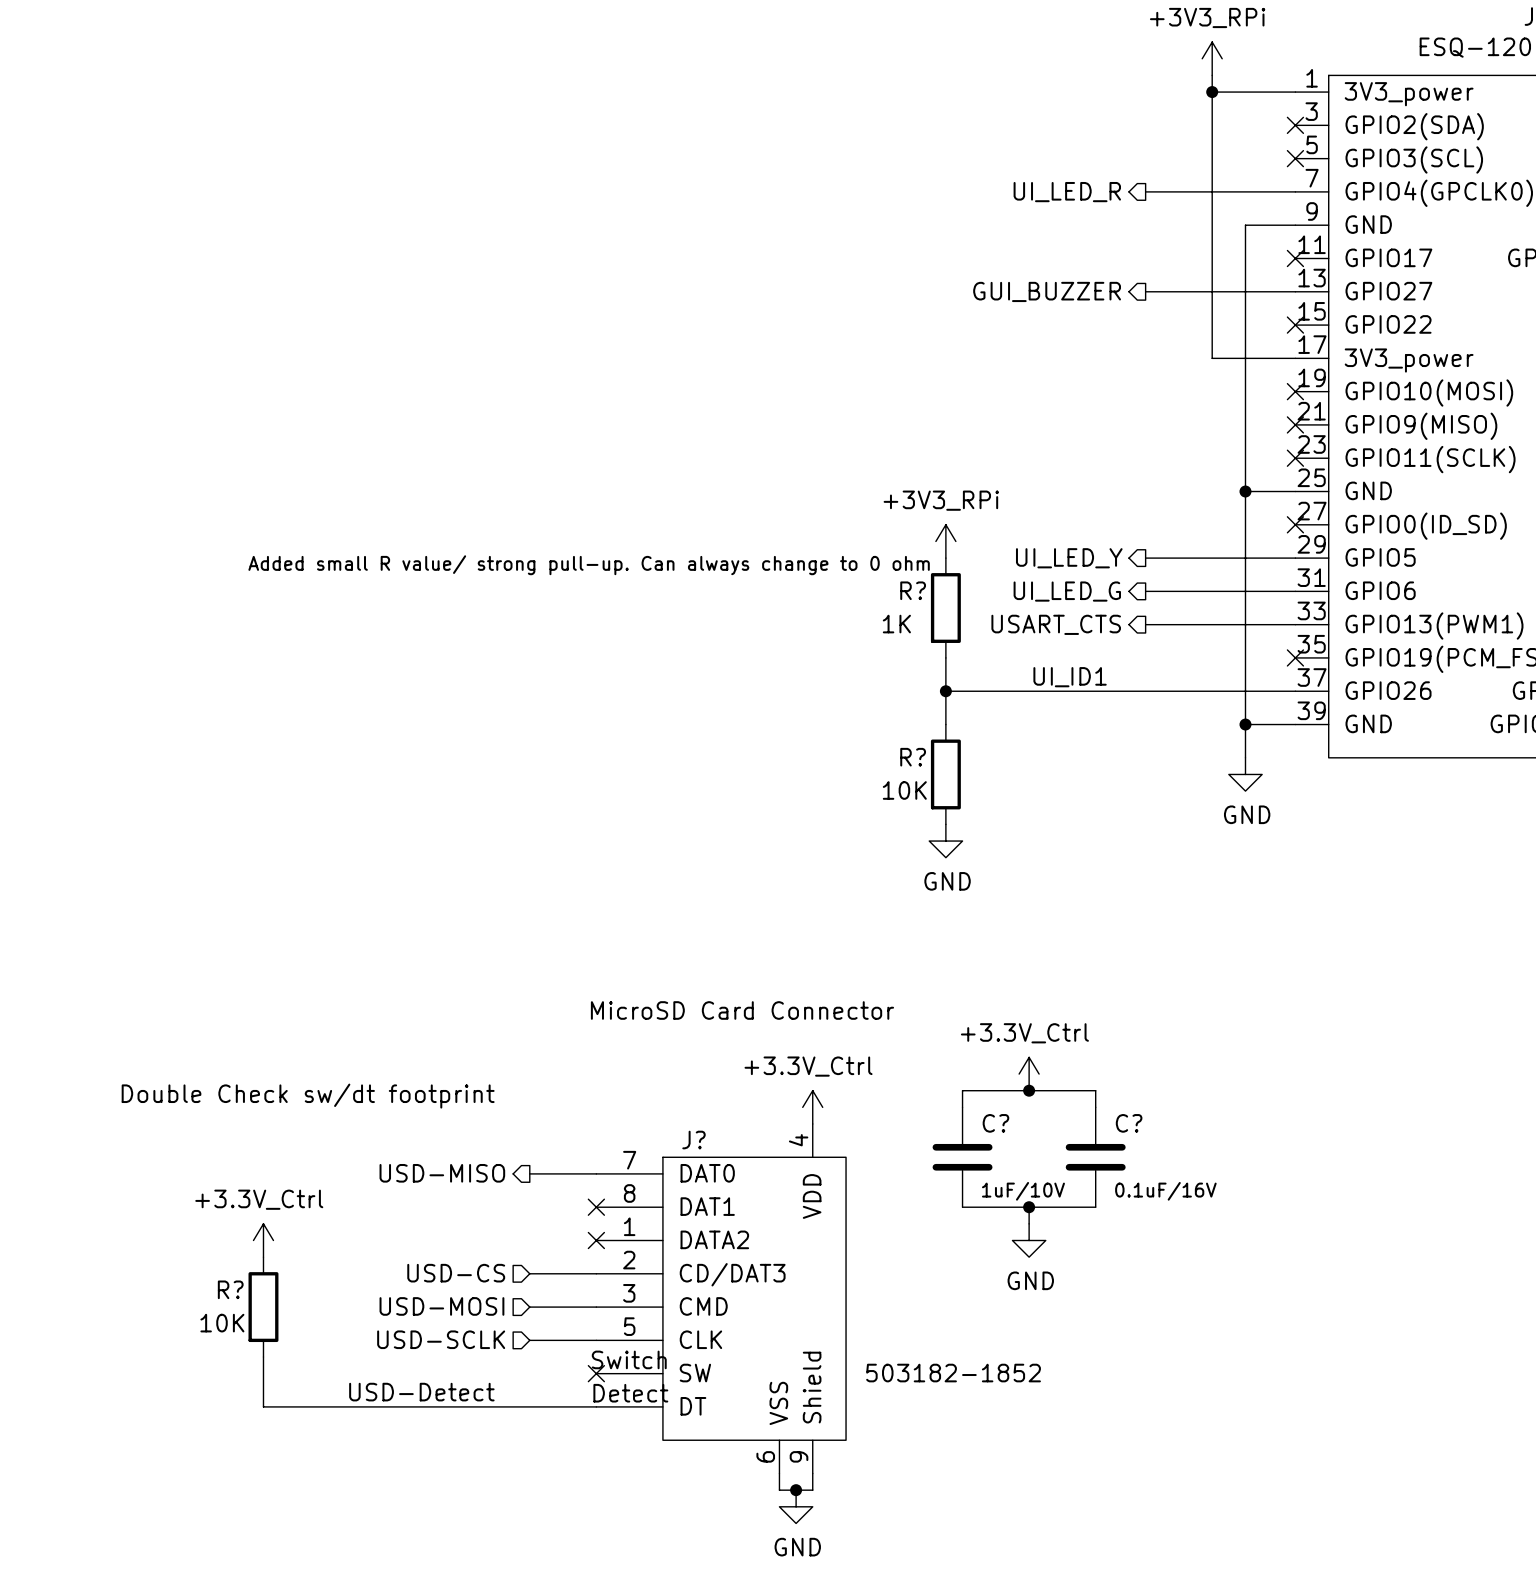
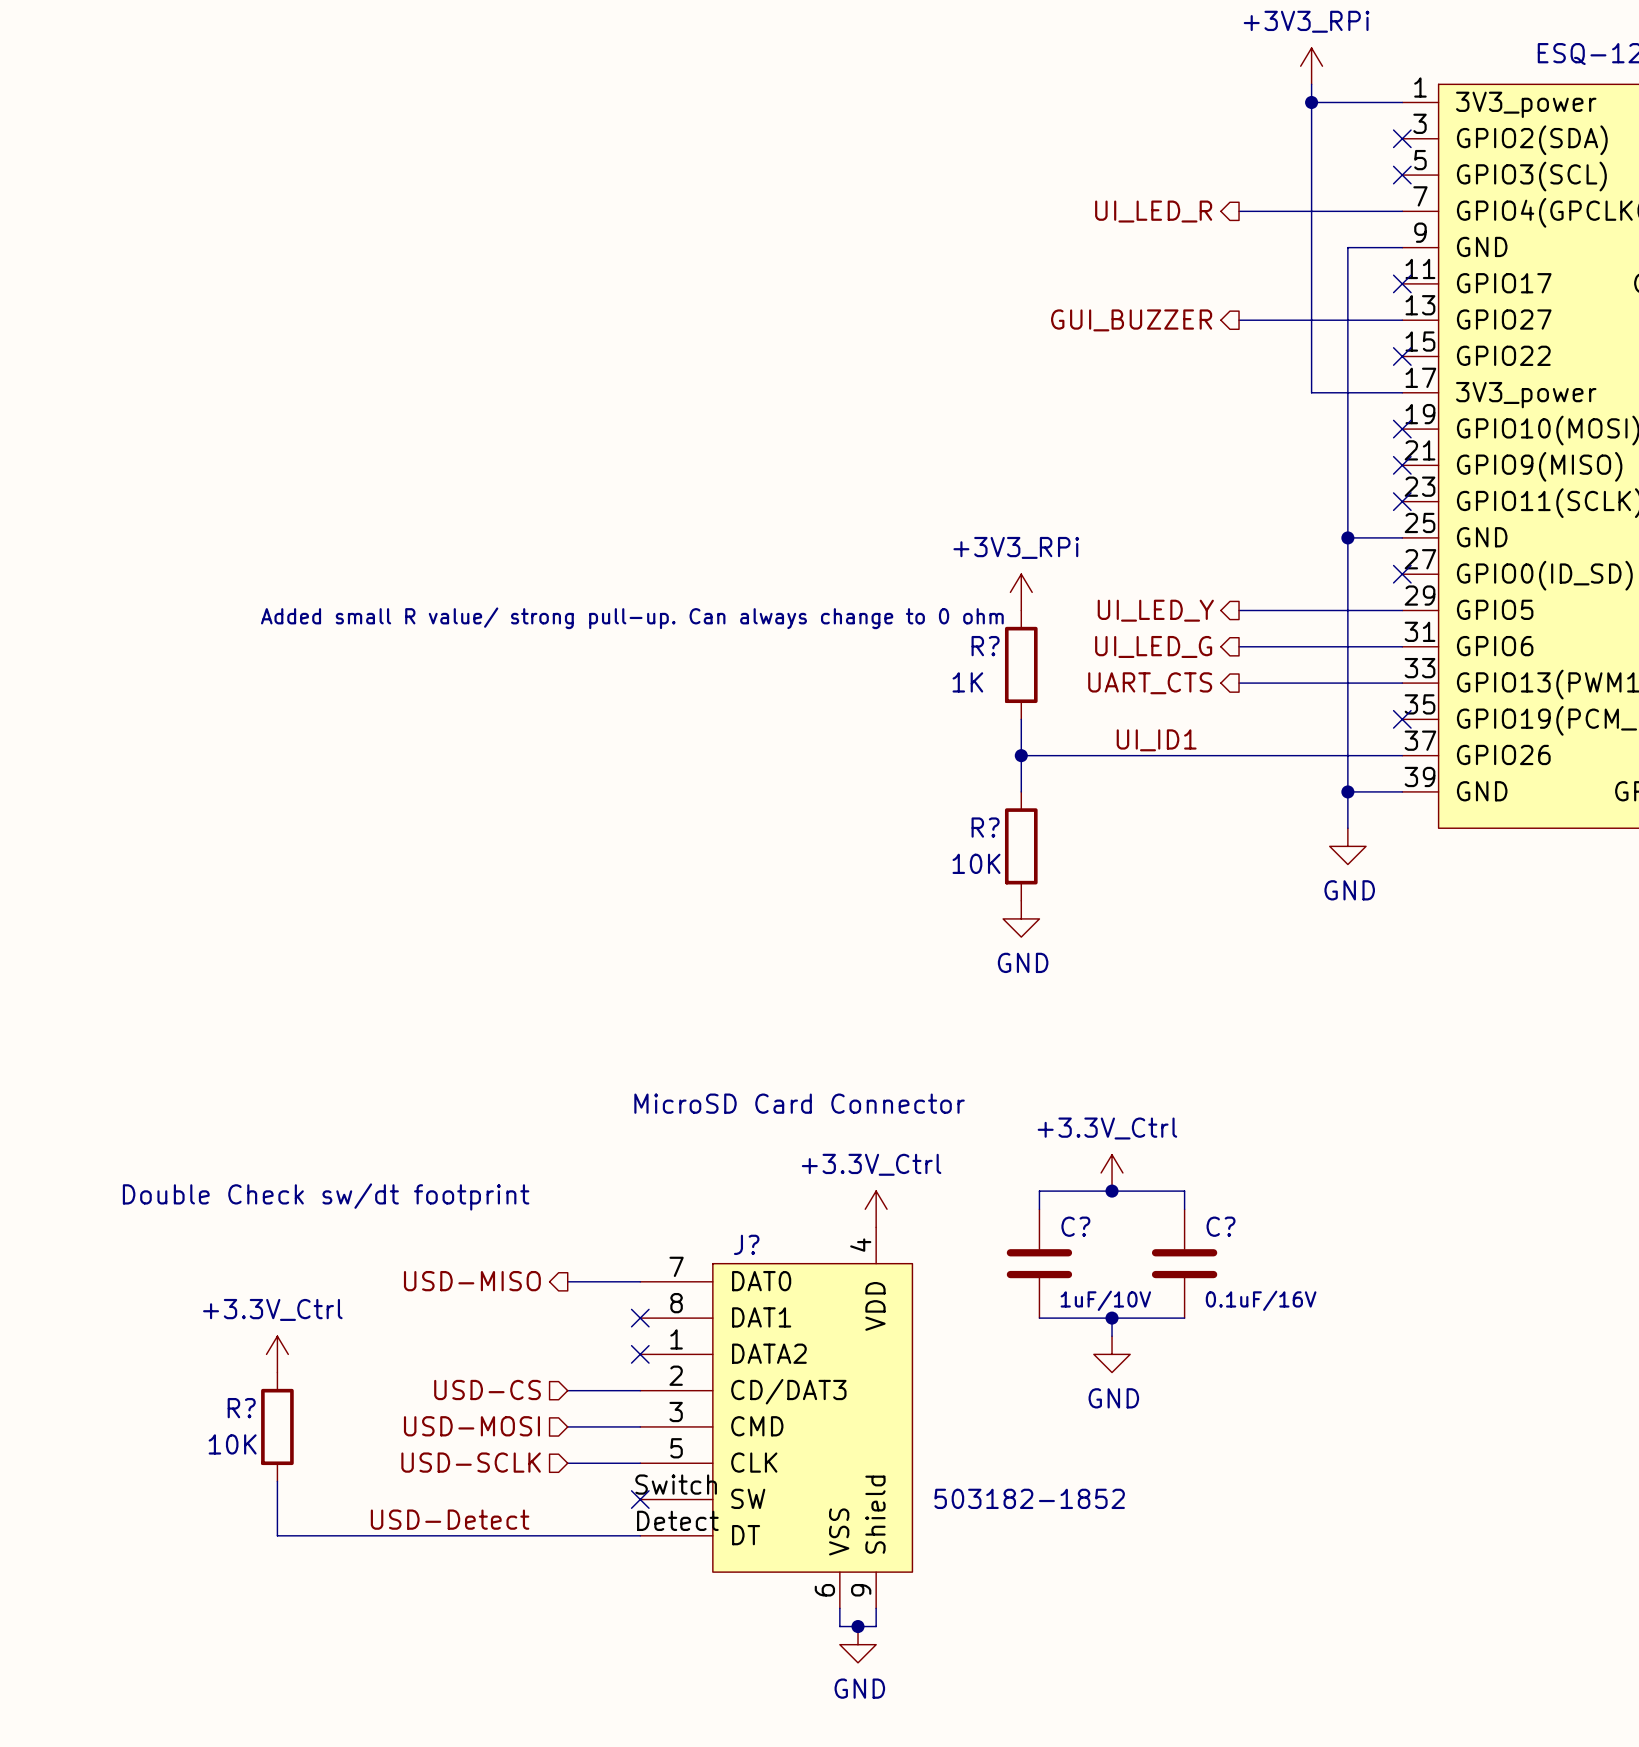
hierarchical label: USART_CTS (1056, 624) -> UART_CTS (1150, 683)

